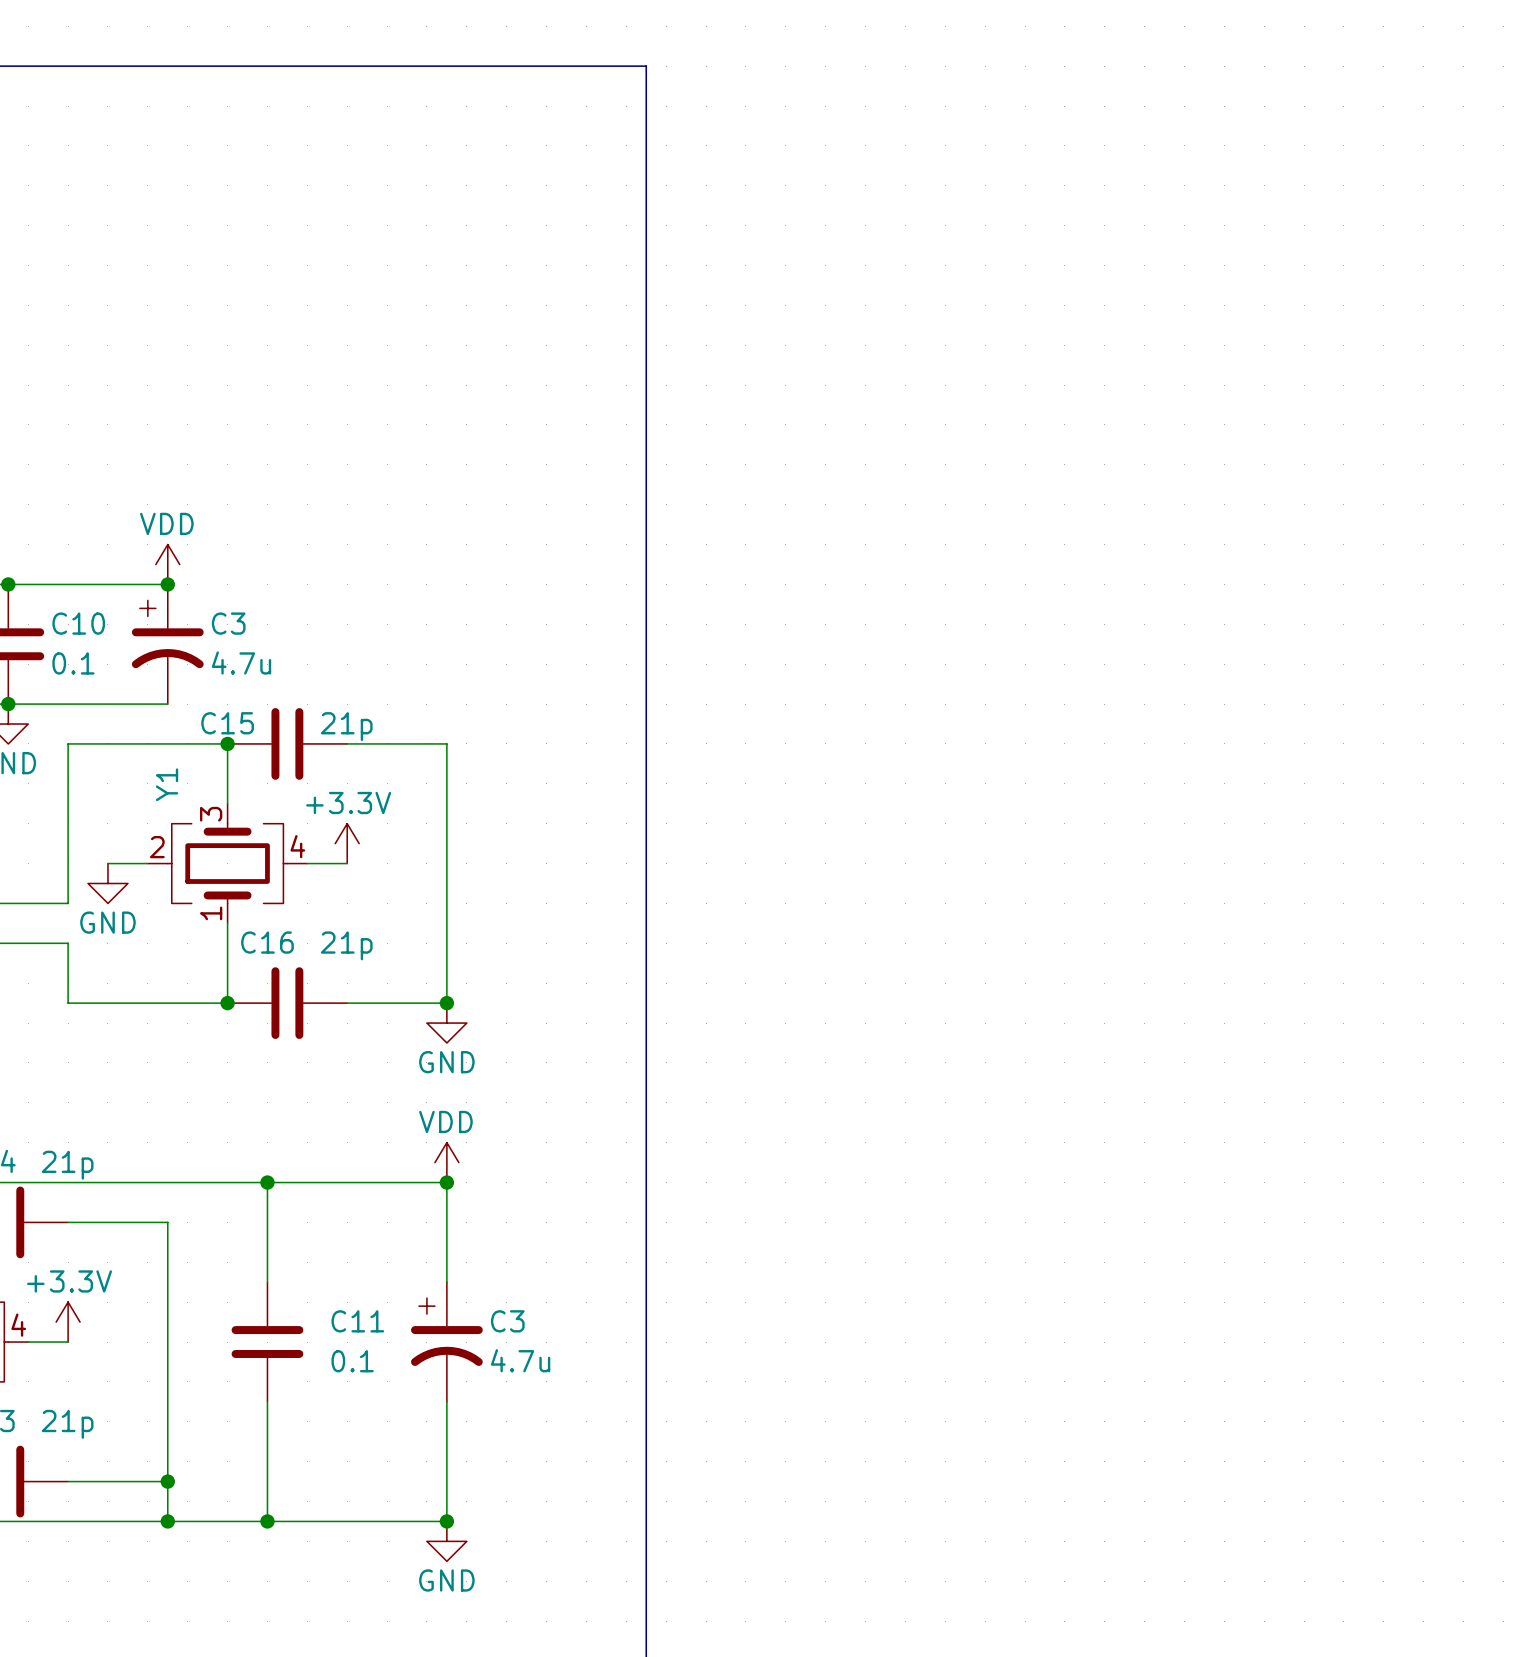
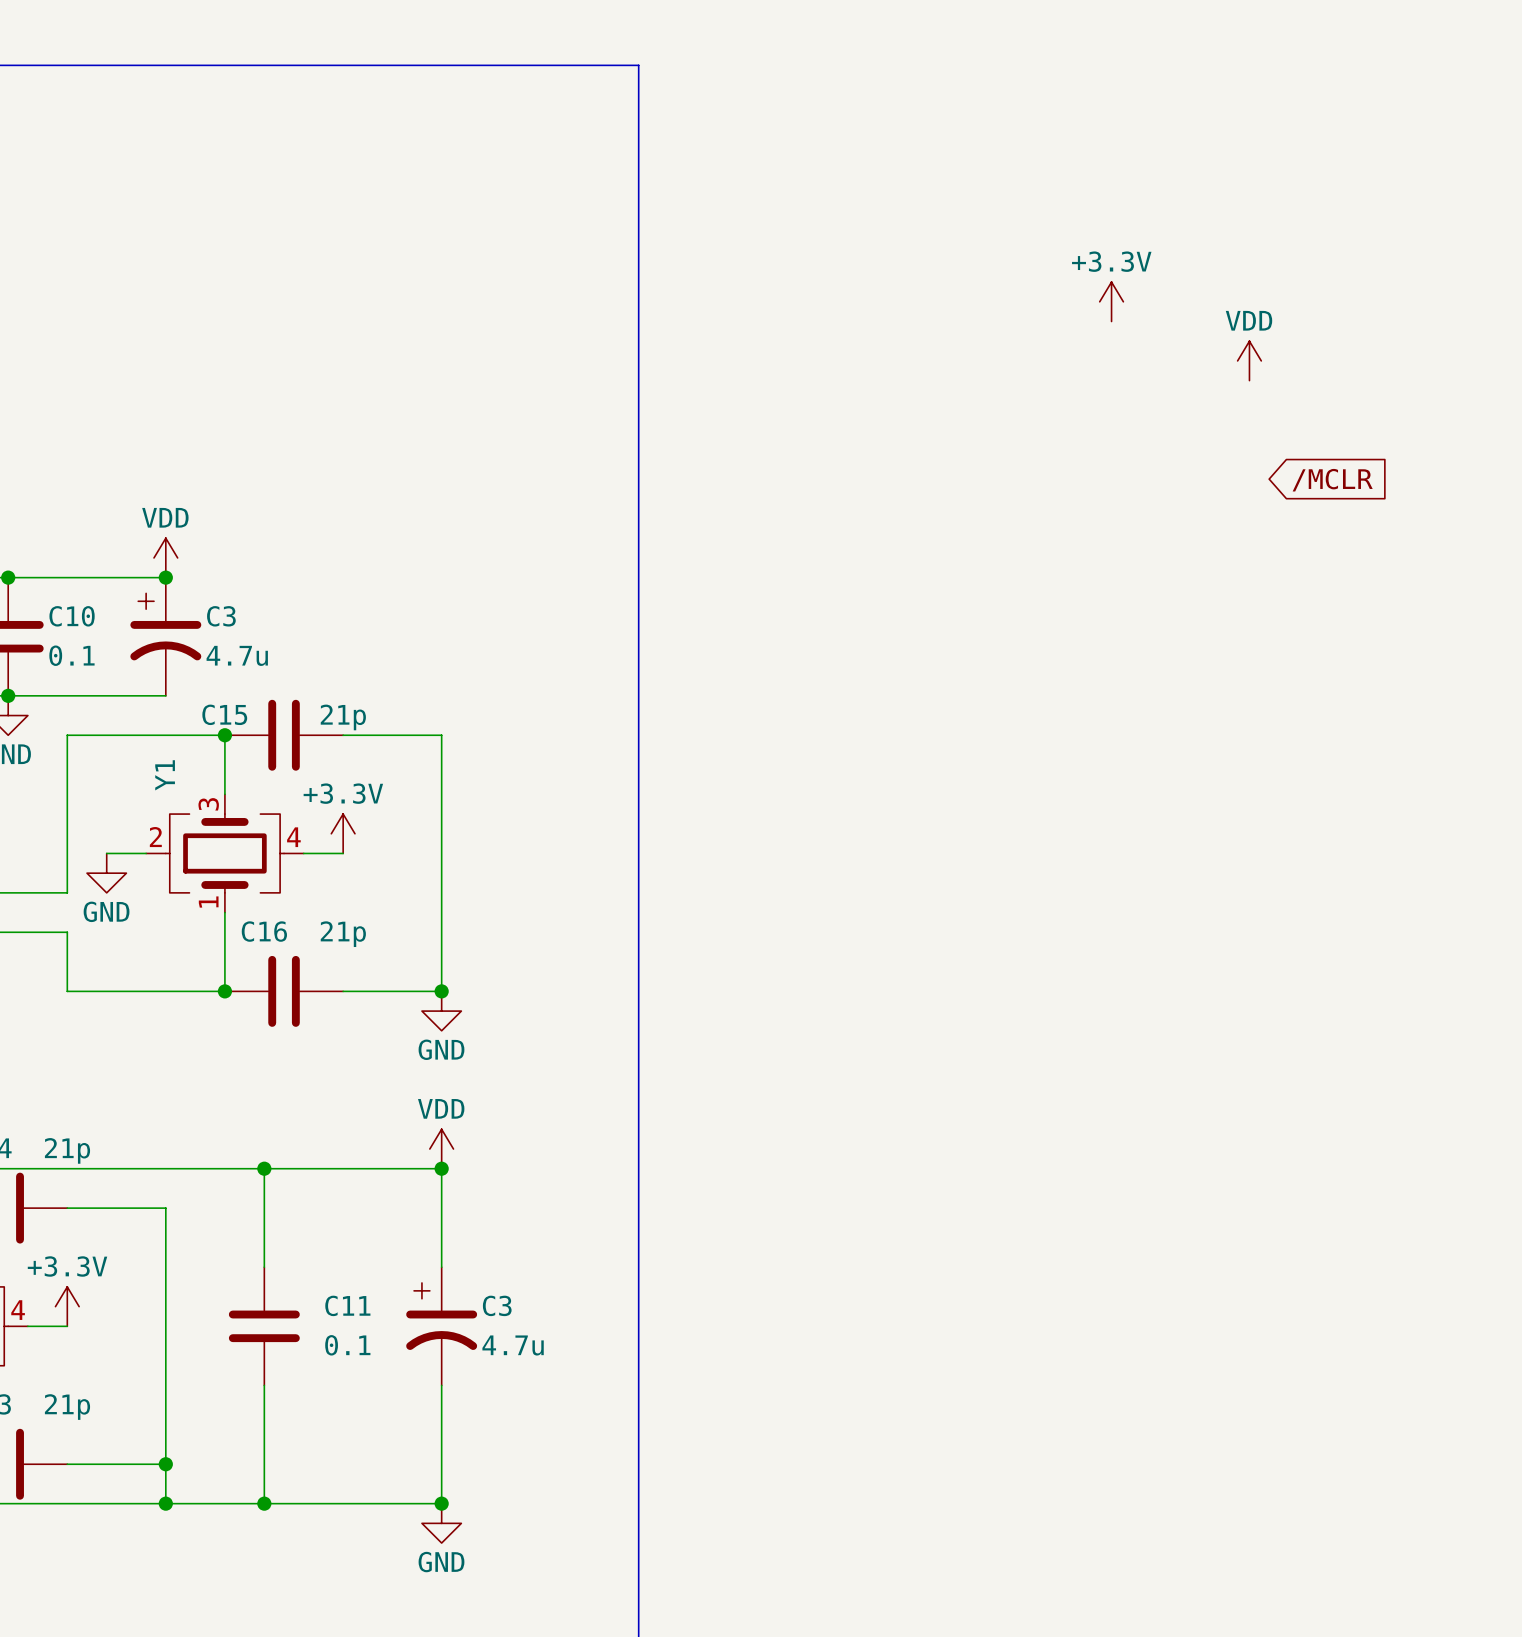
power symbol: none -> +3.3V (1111, 301)
power symbol: none -> VDD (1249, 360)
global label: none -> /MCLR (1332, 480)

